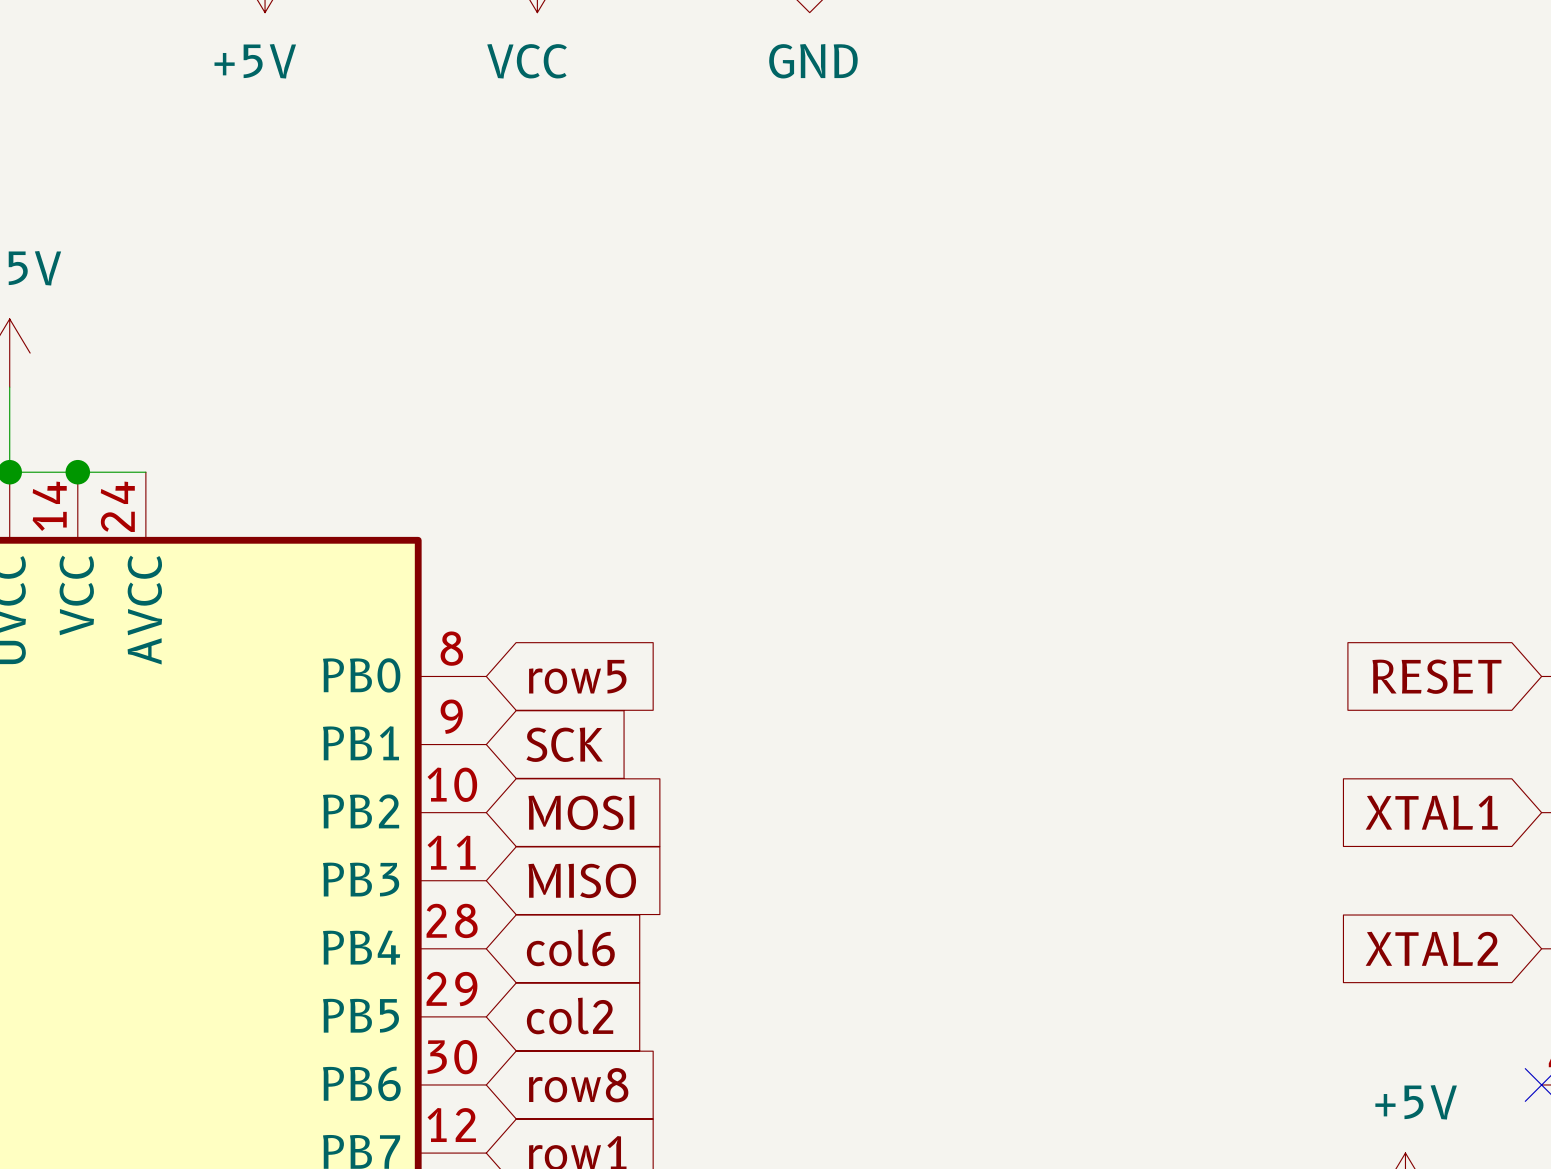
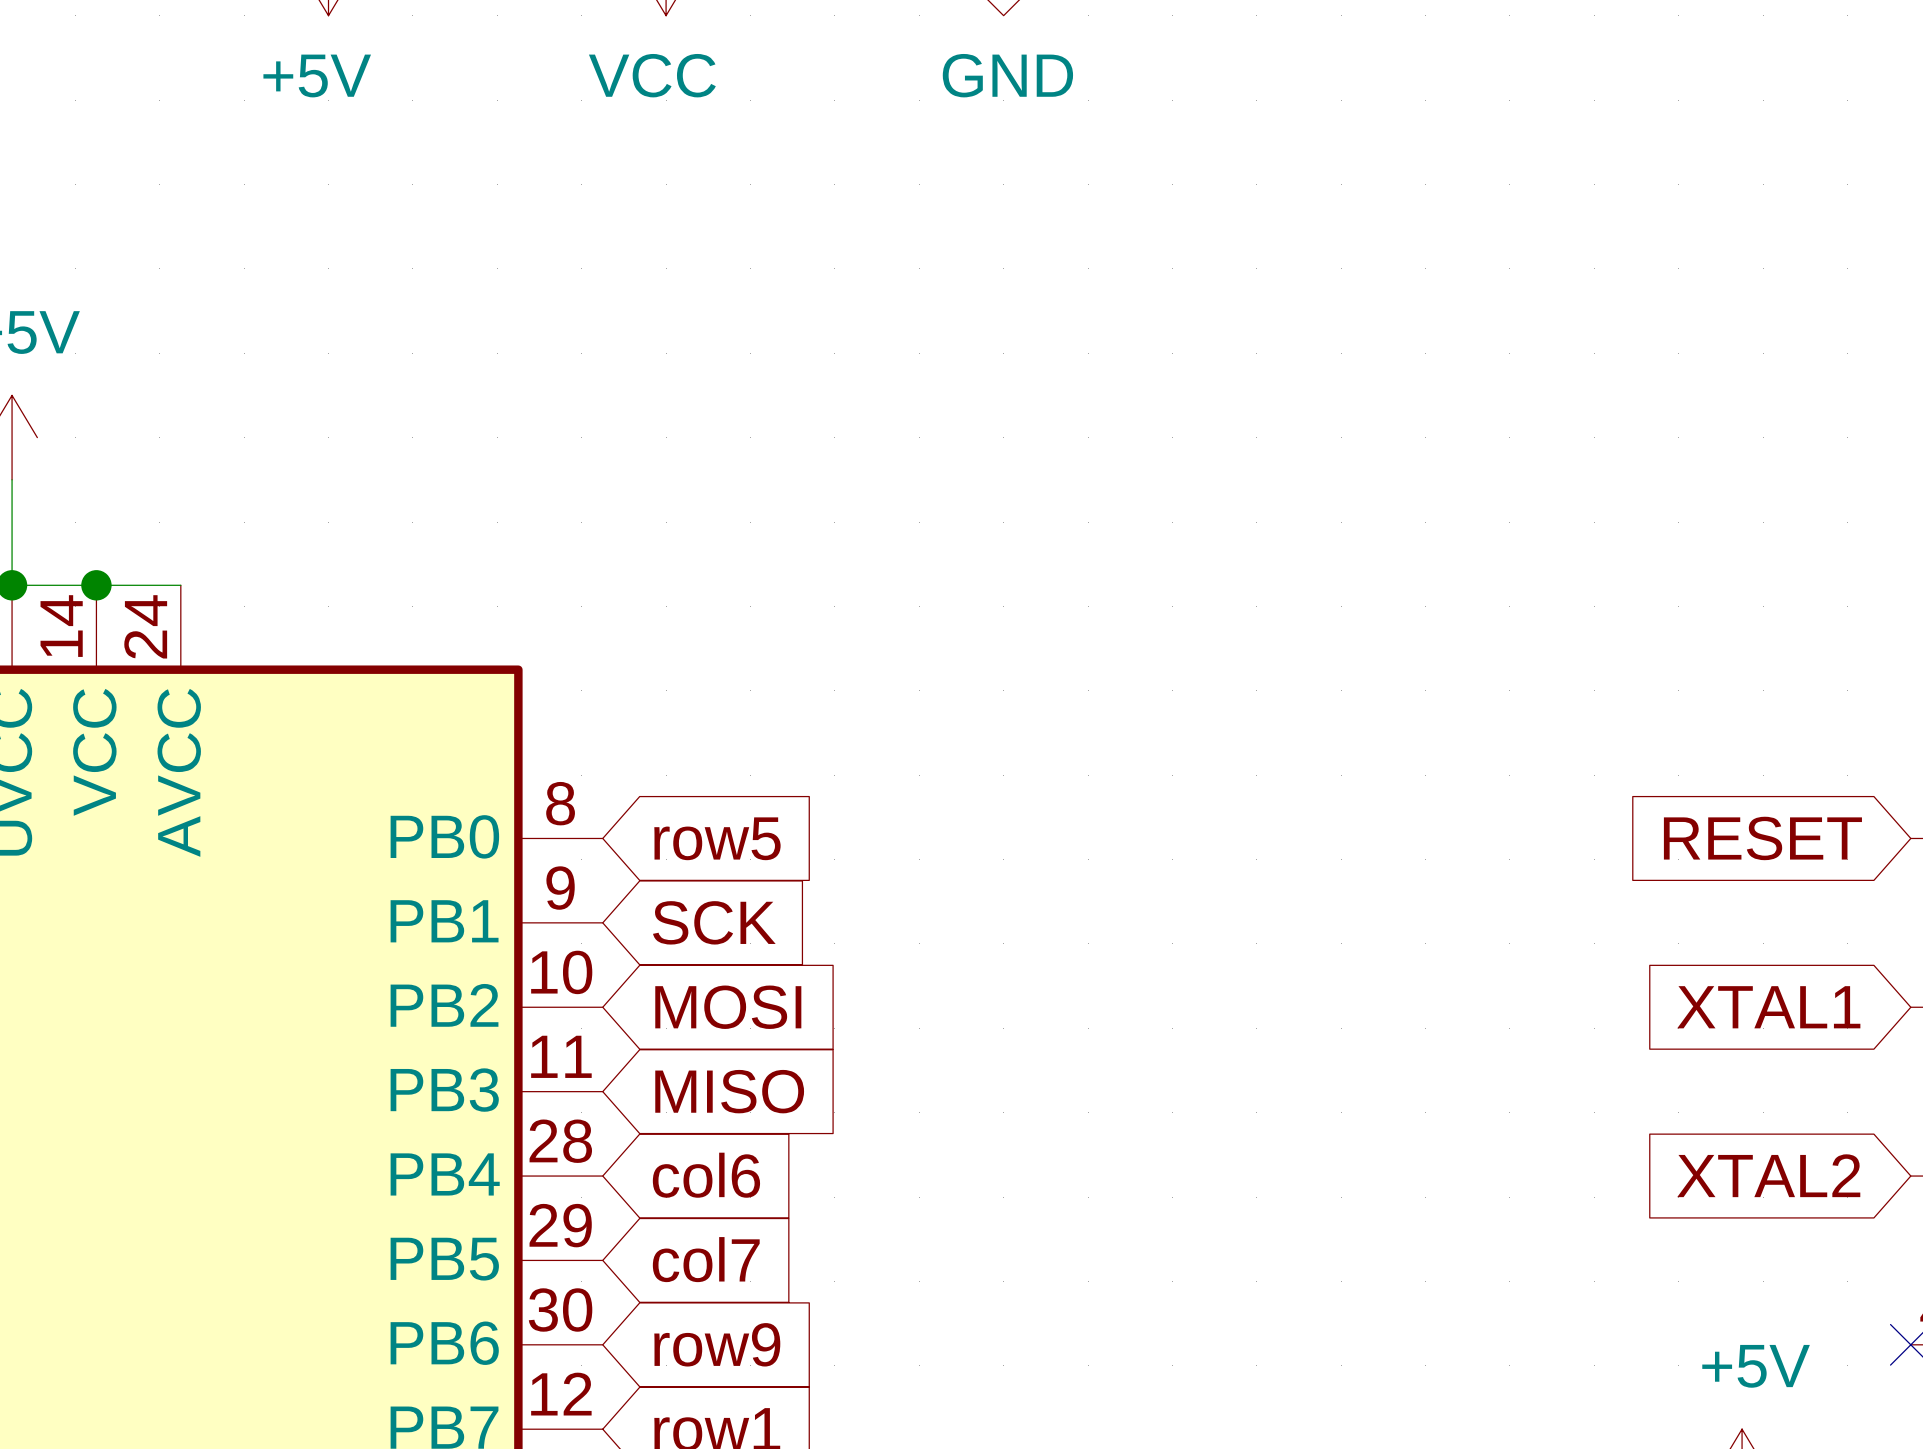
global label: col2 (570, 1015) -> col7 (706, 1259)
global label: row8 (578, 1085) -> row9 (717, 1344)

